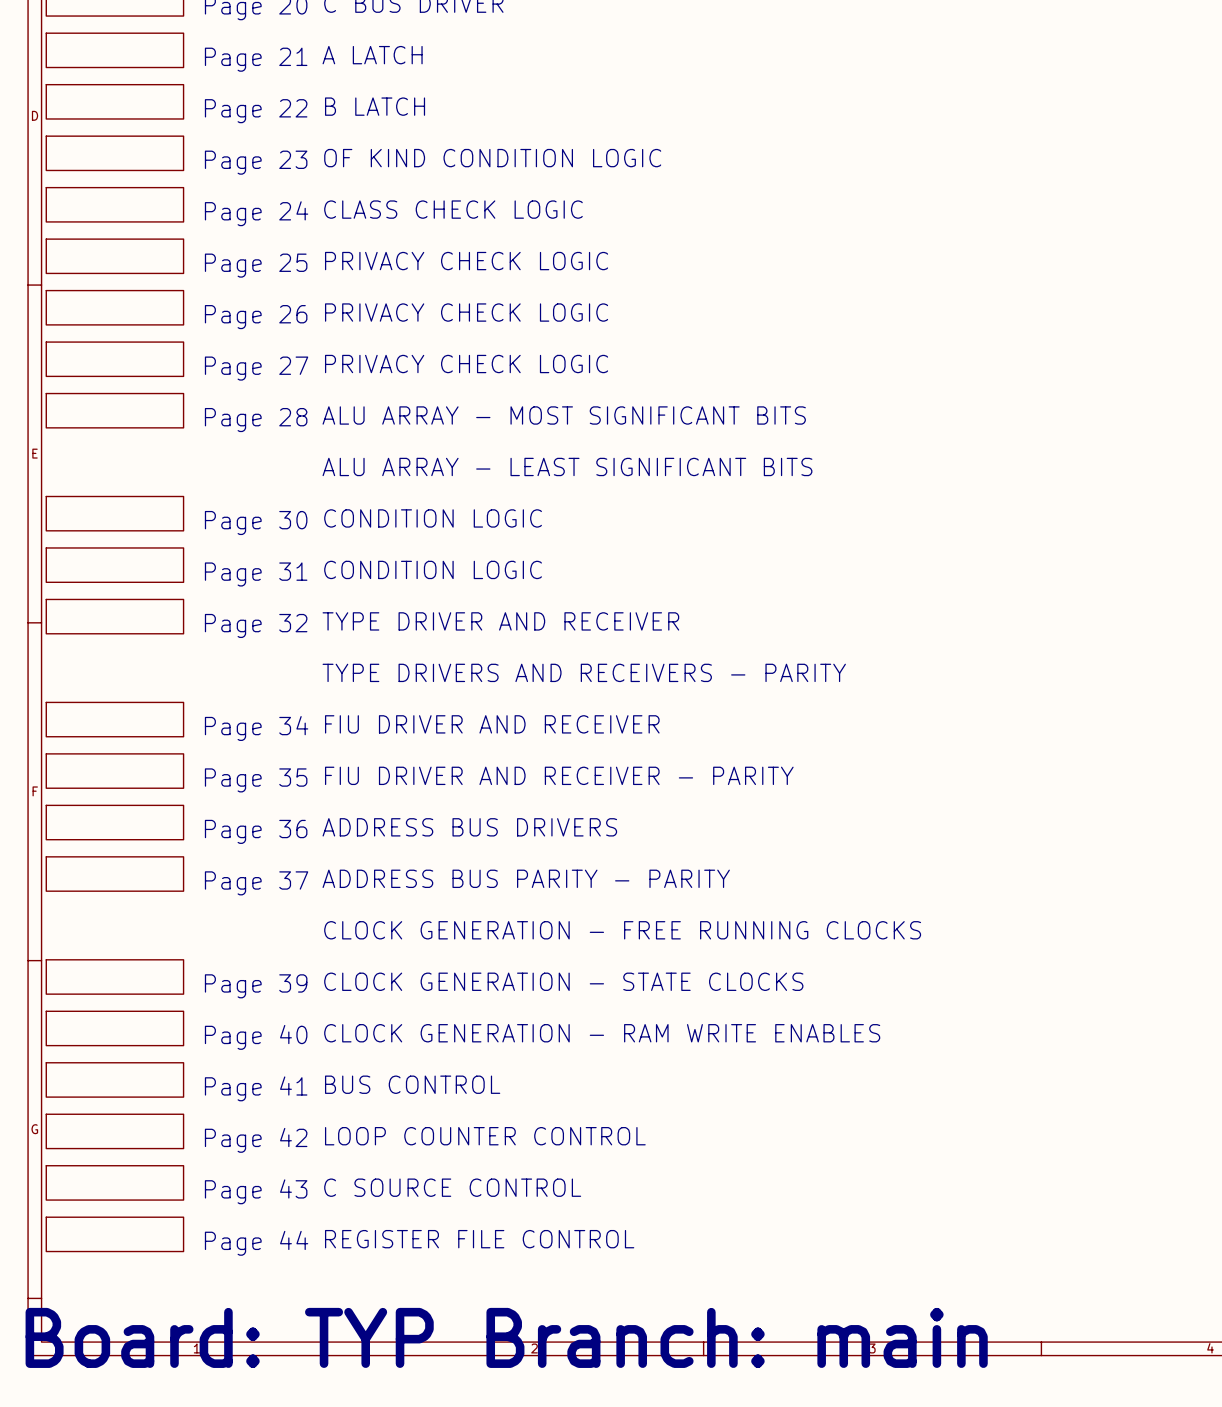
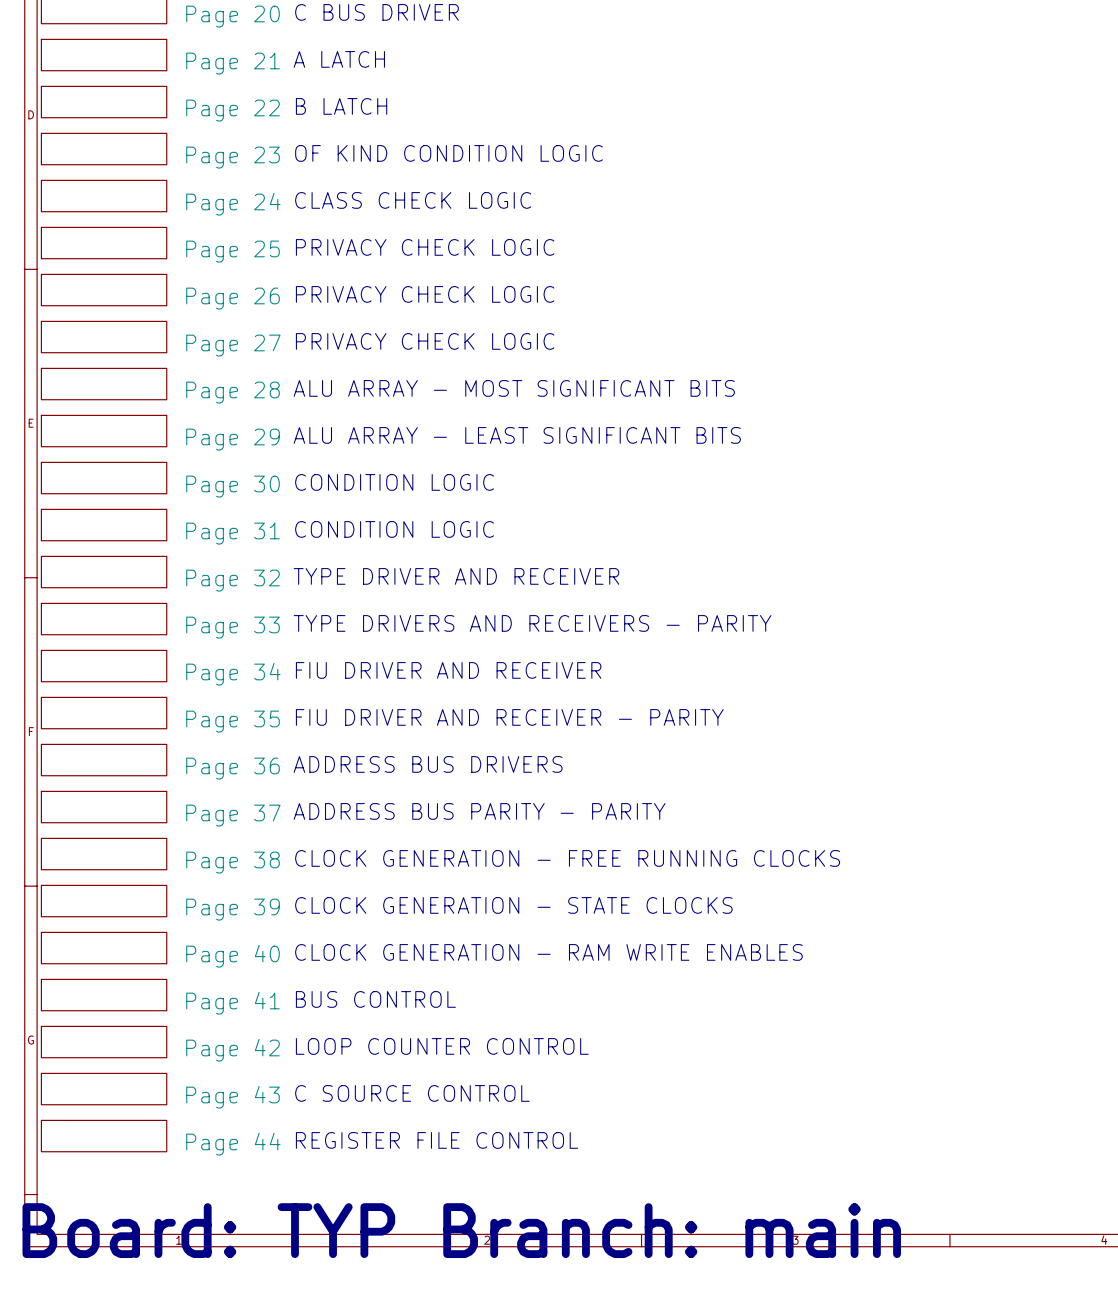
sheet Page 29: none -> (104, 431)
sheet Page 33: none -> (104, 619)
sheet Page 38: none -> (104, 854)

